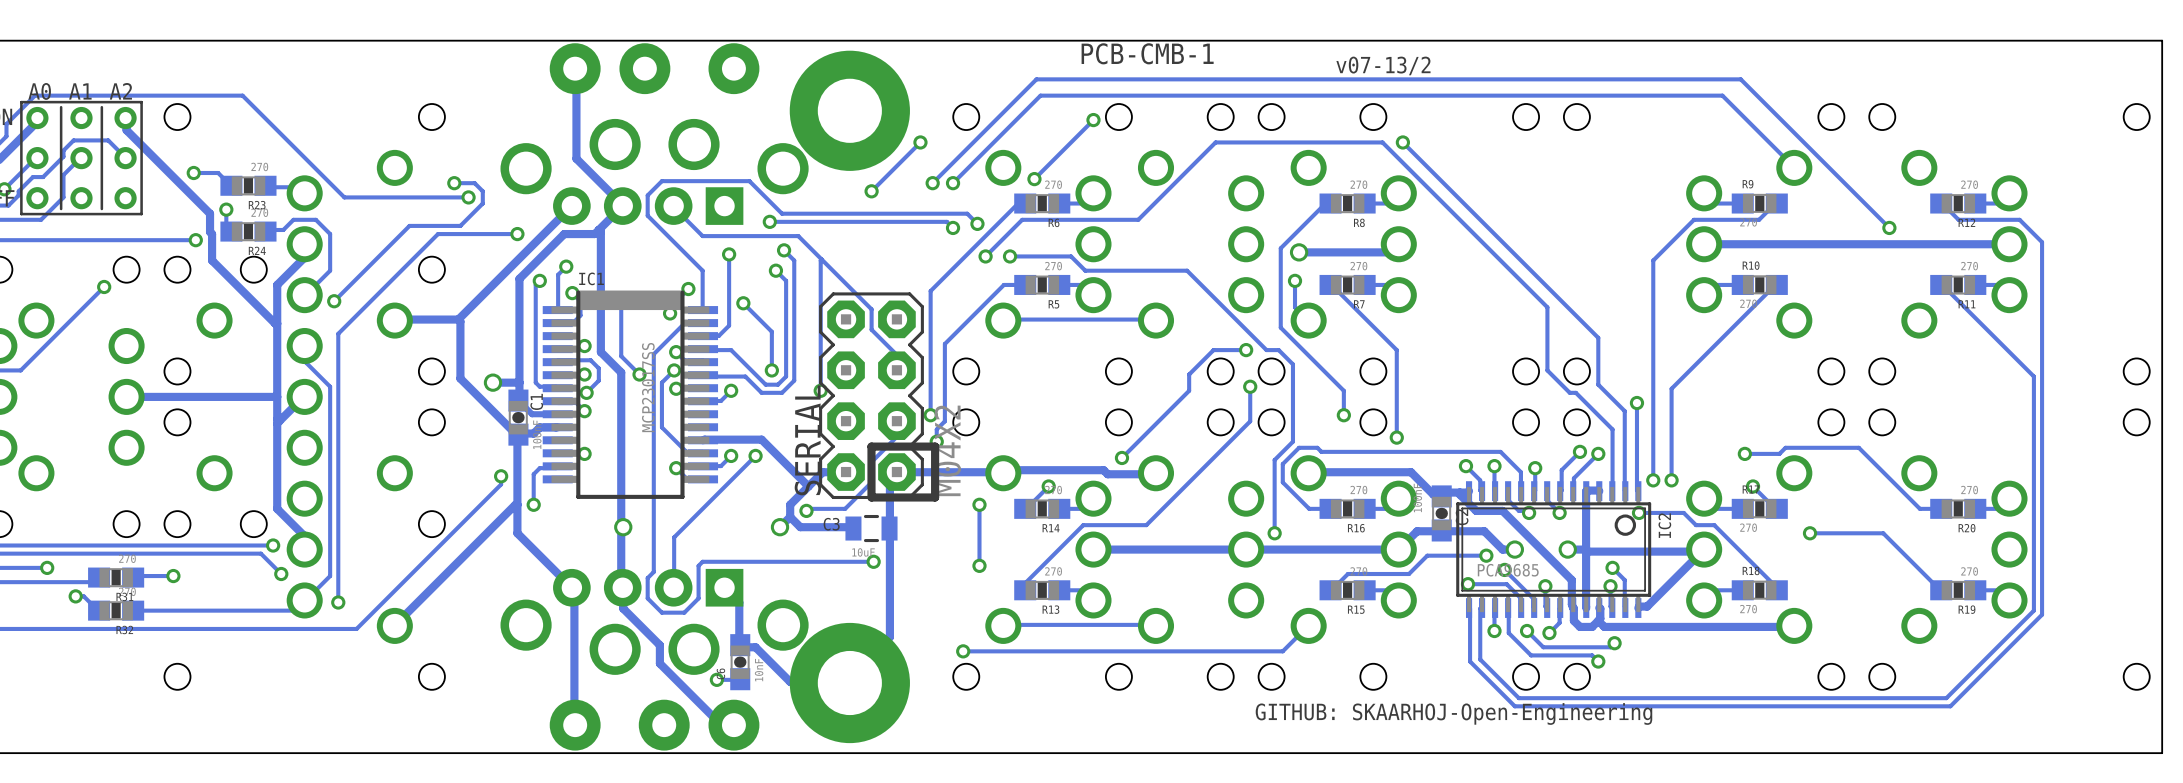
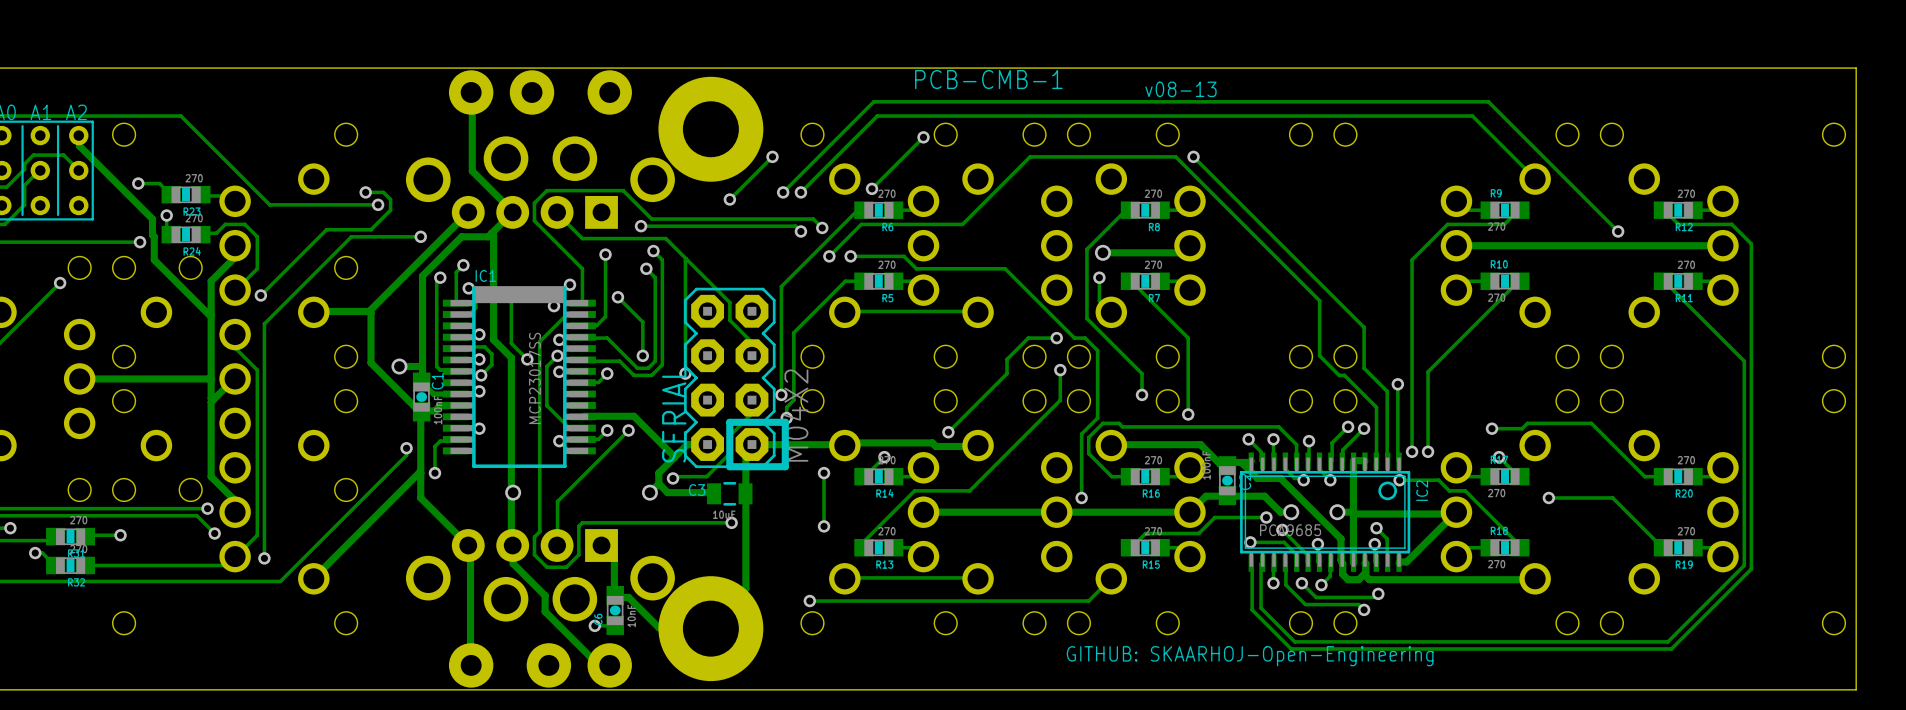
text: v07-13/2 (1383, 65) -> v08-13 (1180, 89)

